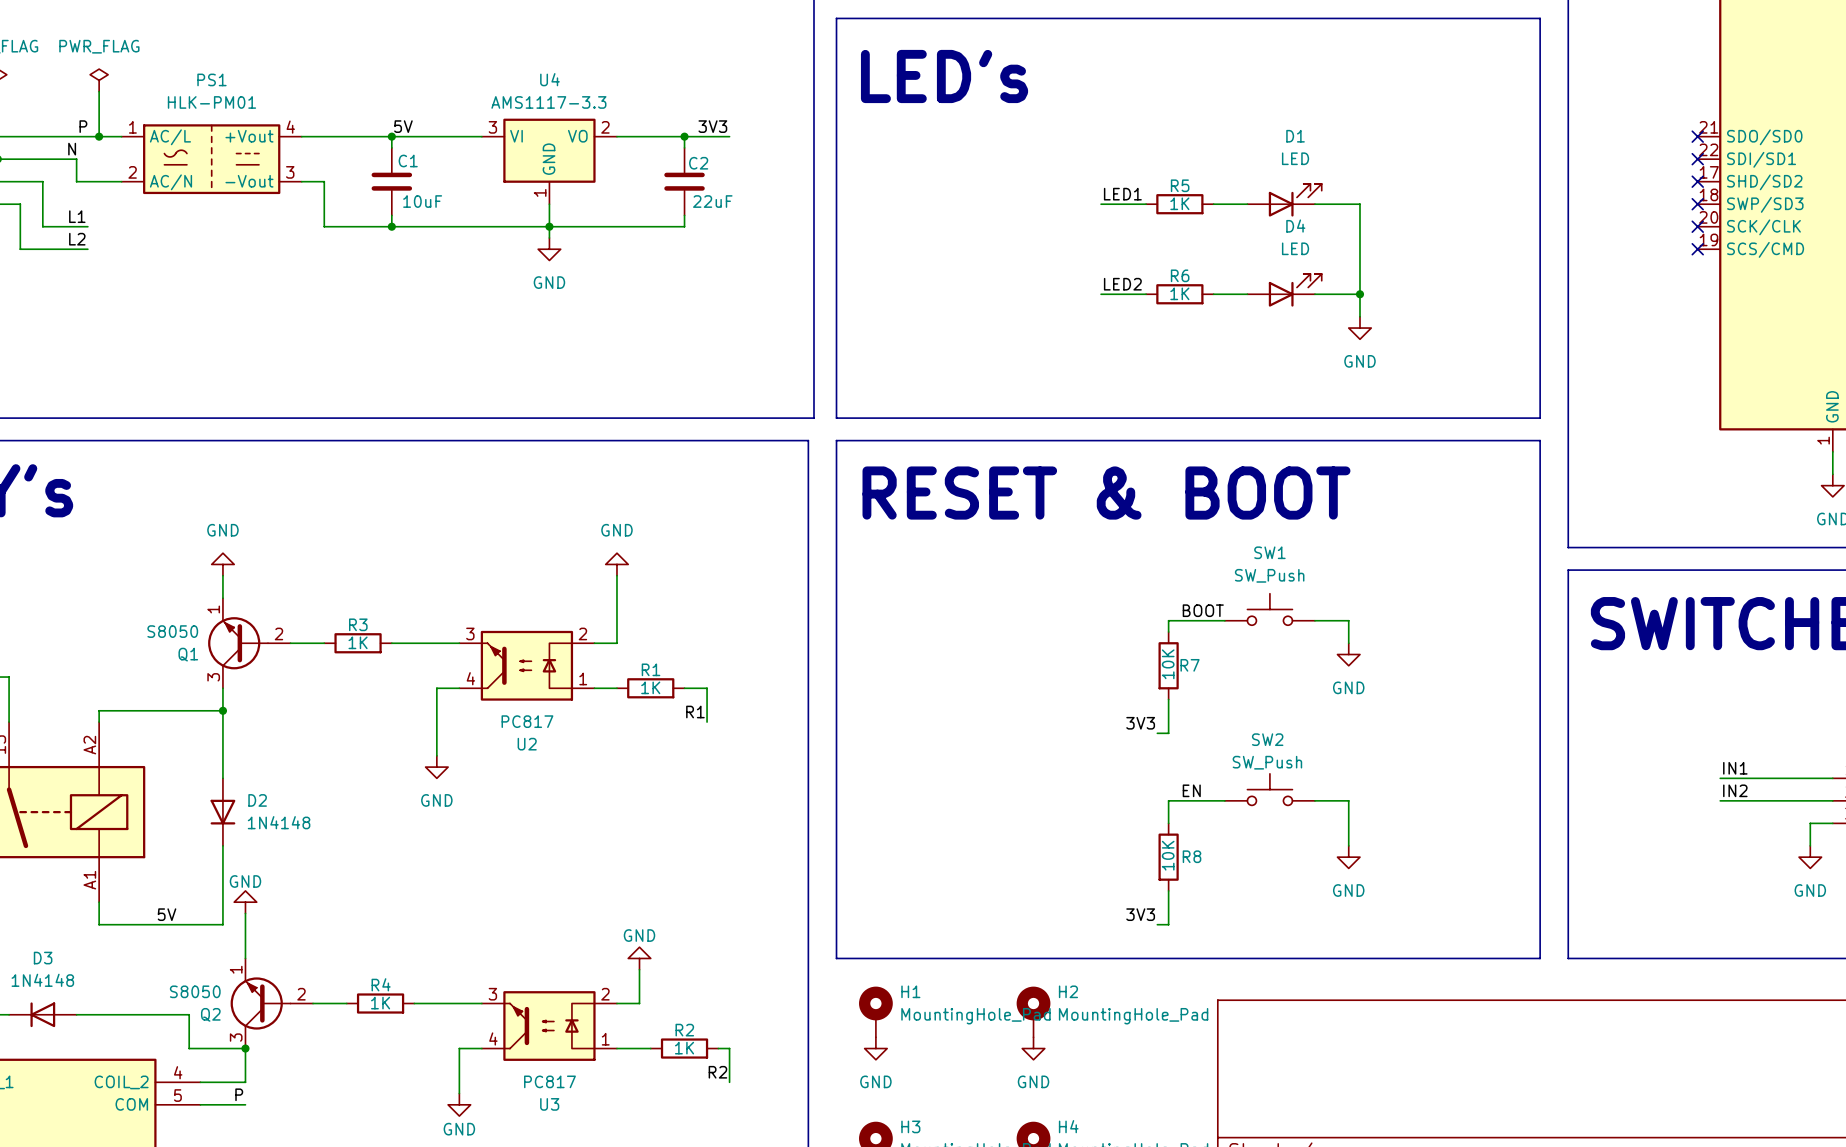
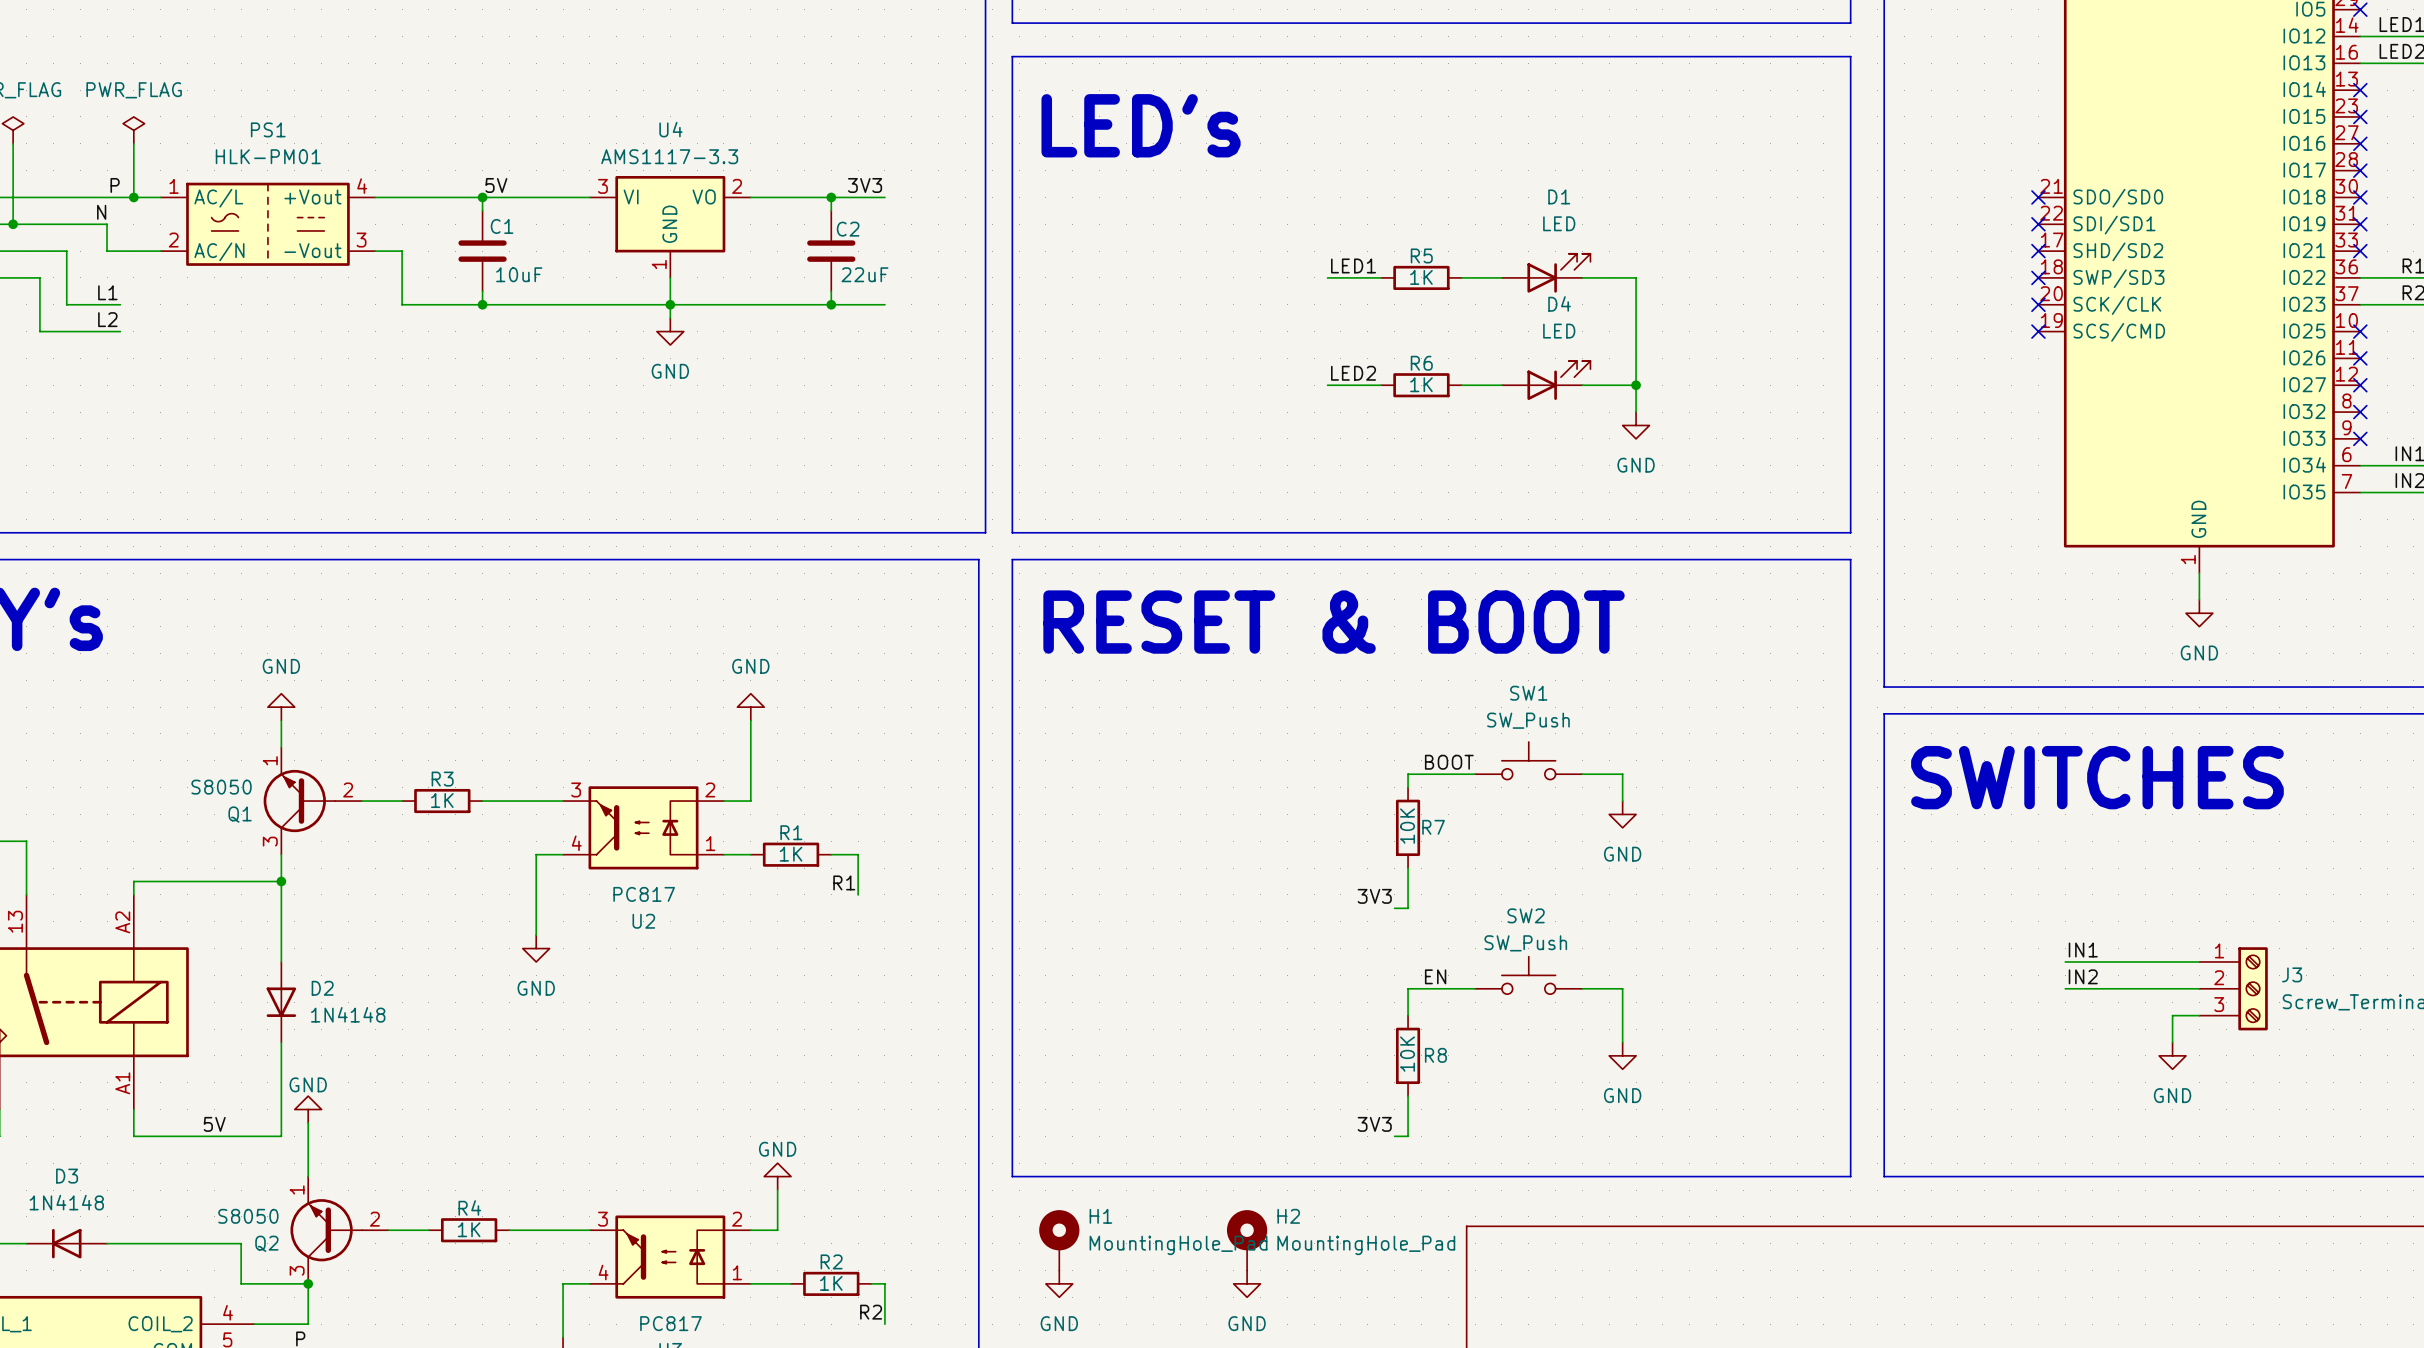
wire: none -> (831, 304) (884, 304)
junction: none -> (831, 304)

